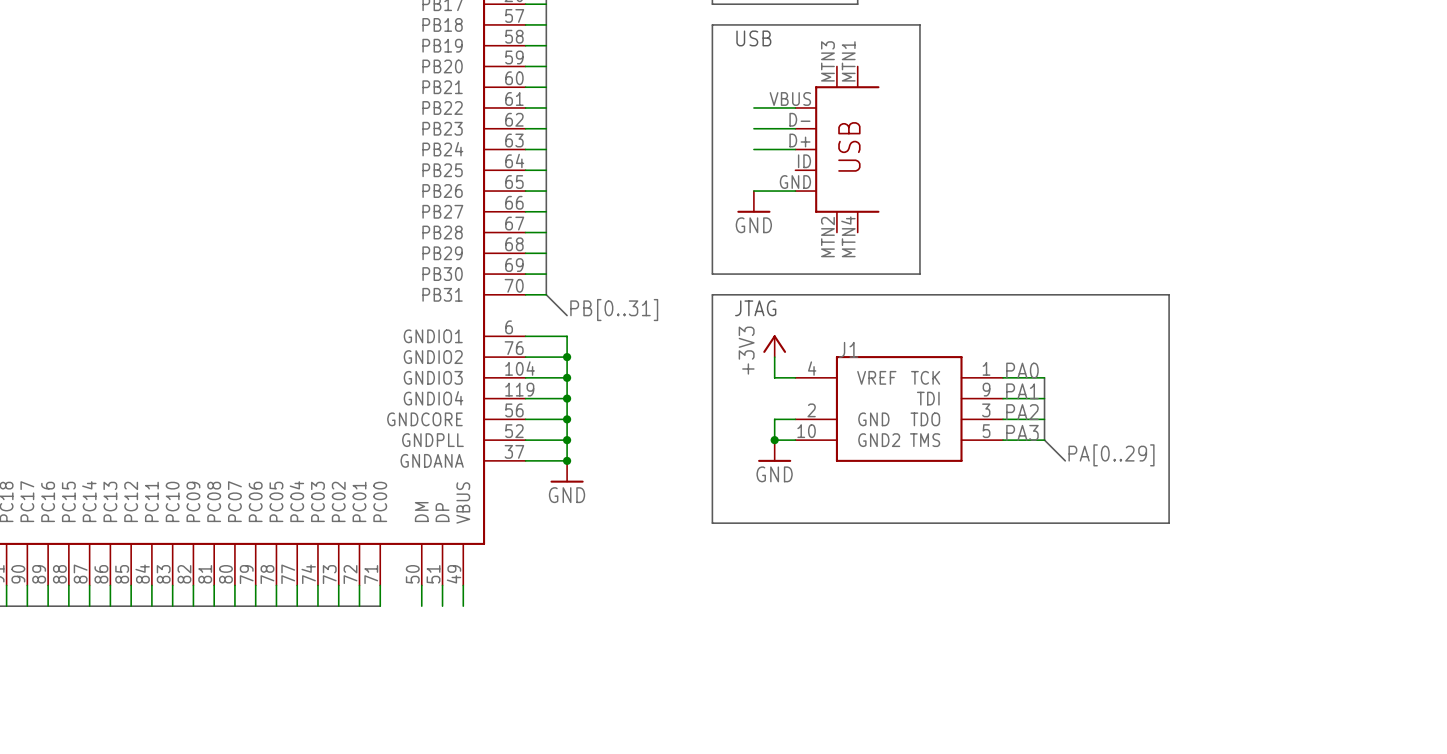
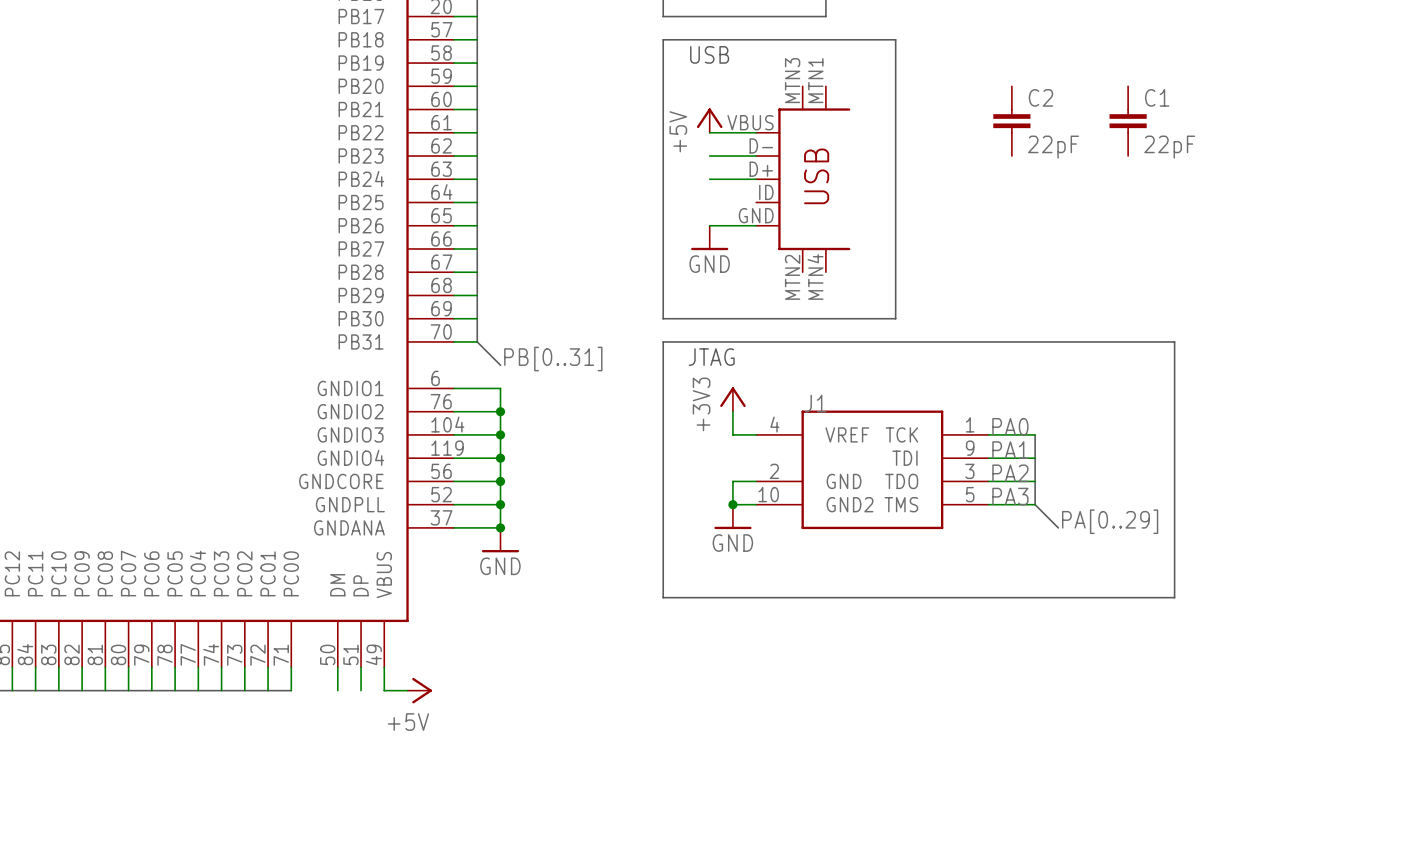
power symbol: none -> +5V (709, 120)
C2: none -> 22pF (1011, 121)
C1: none -> 22pF (1128, 121)
wire: none -> (384, 690) (407, 690)
power symbol: none -> +5V (419, 690)

